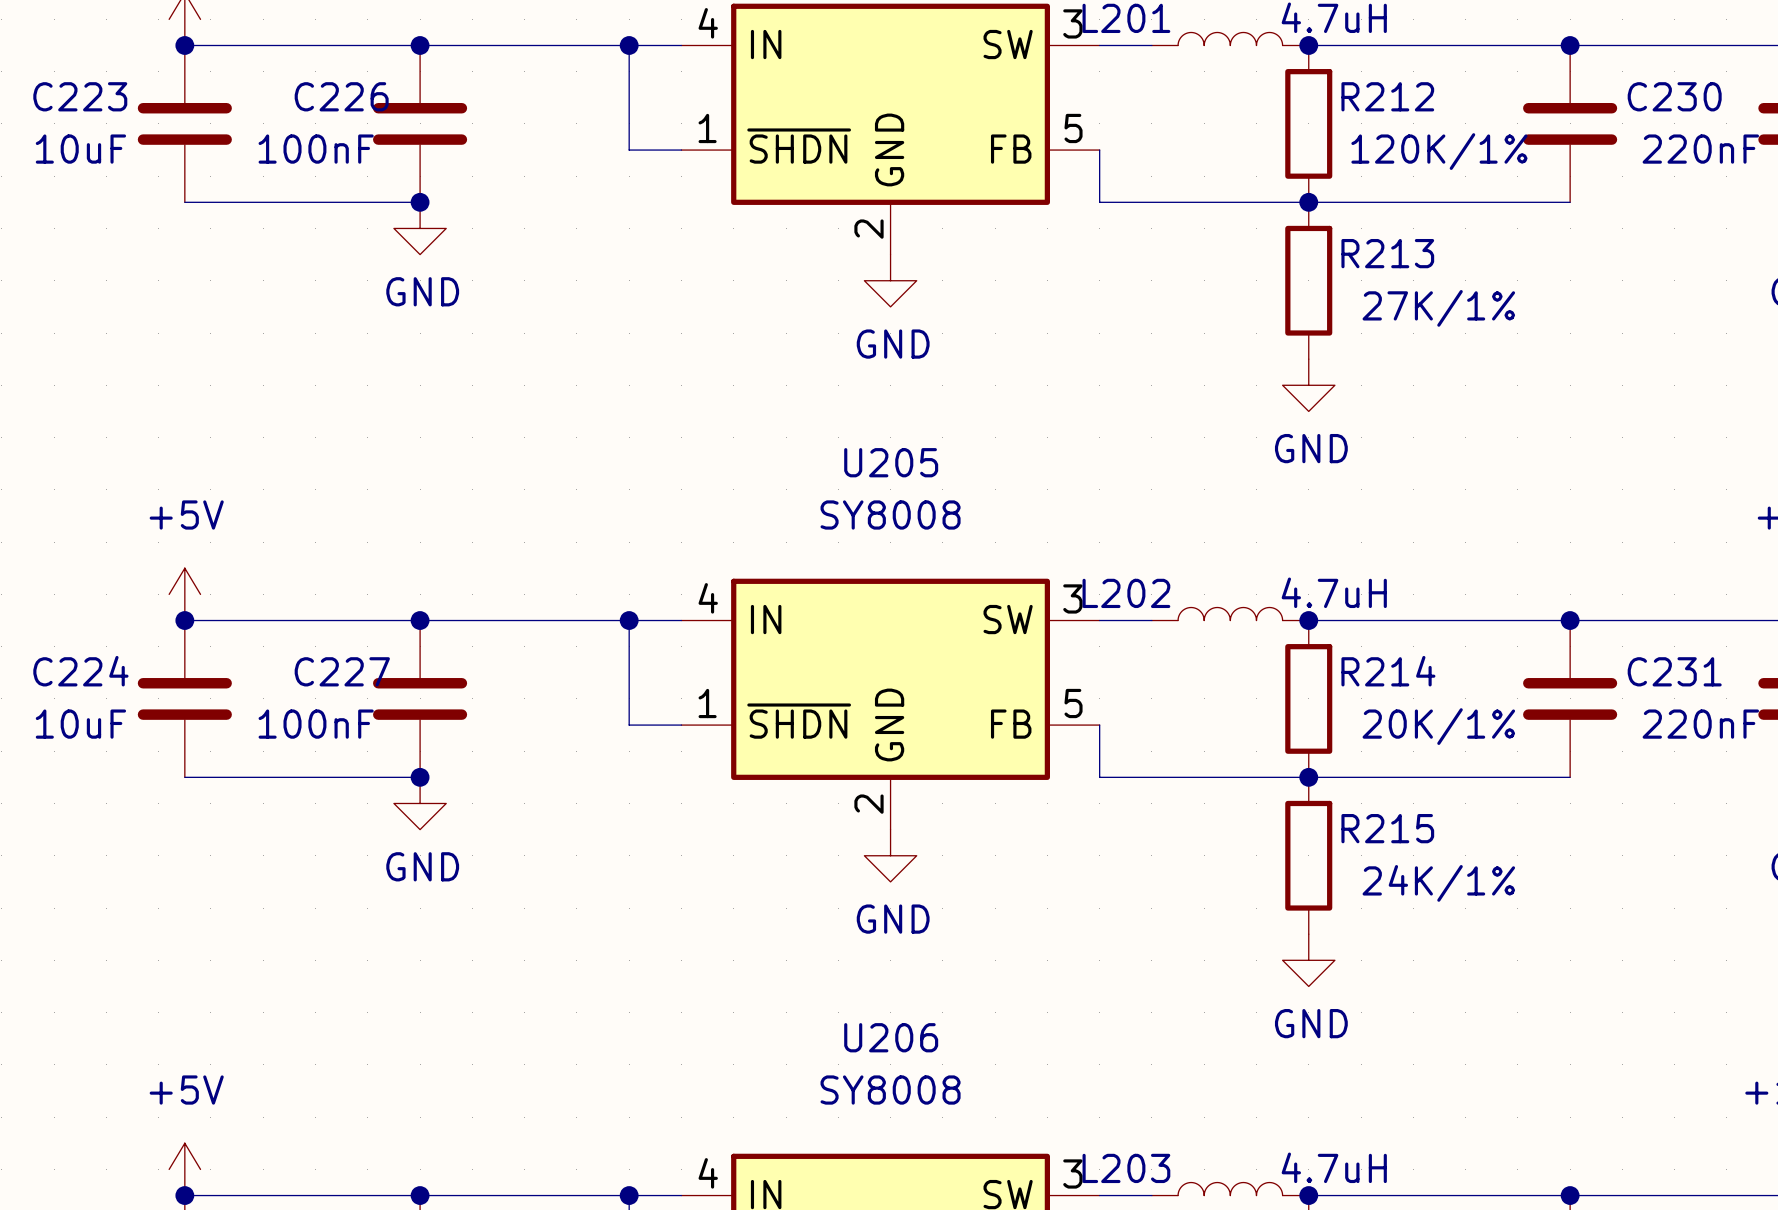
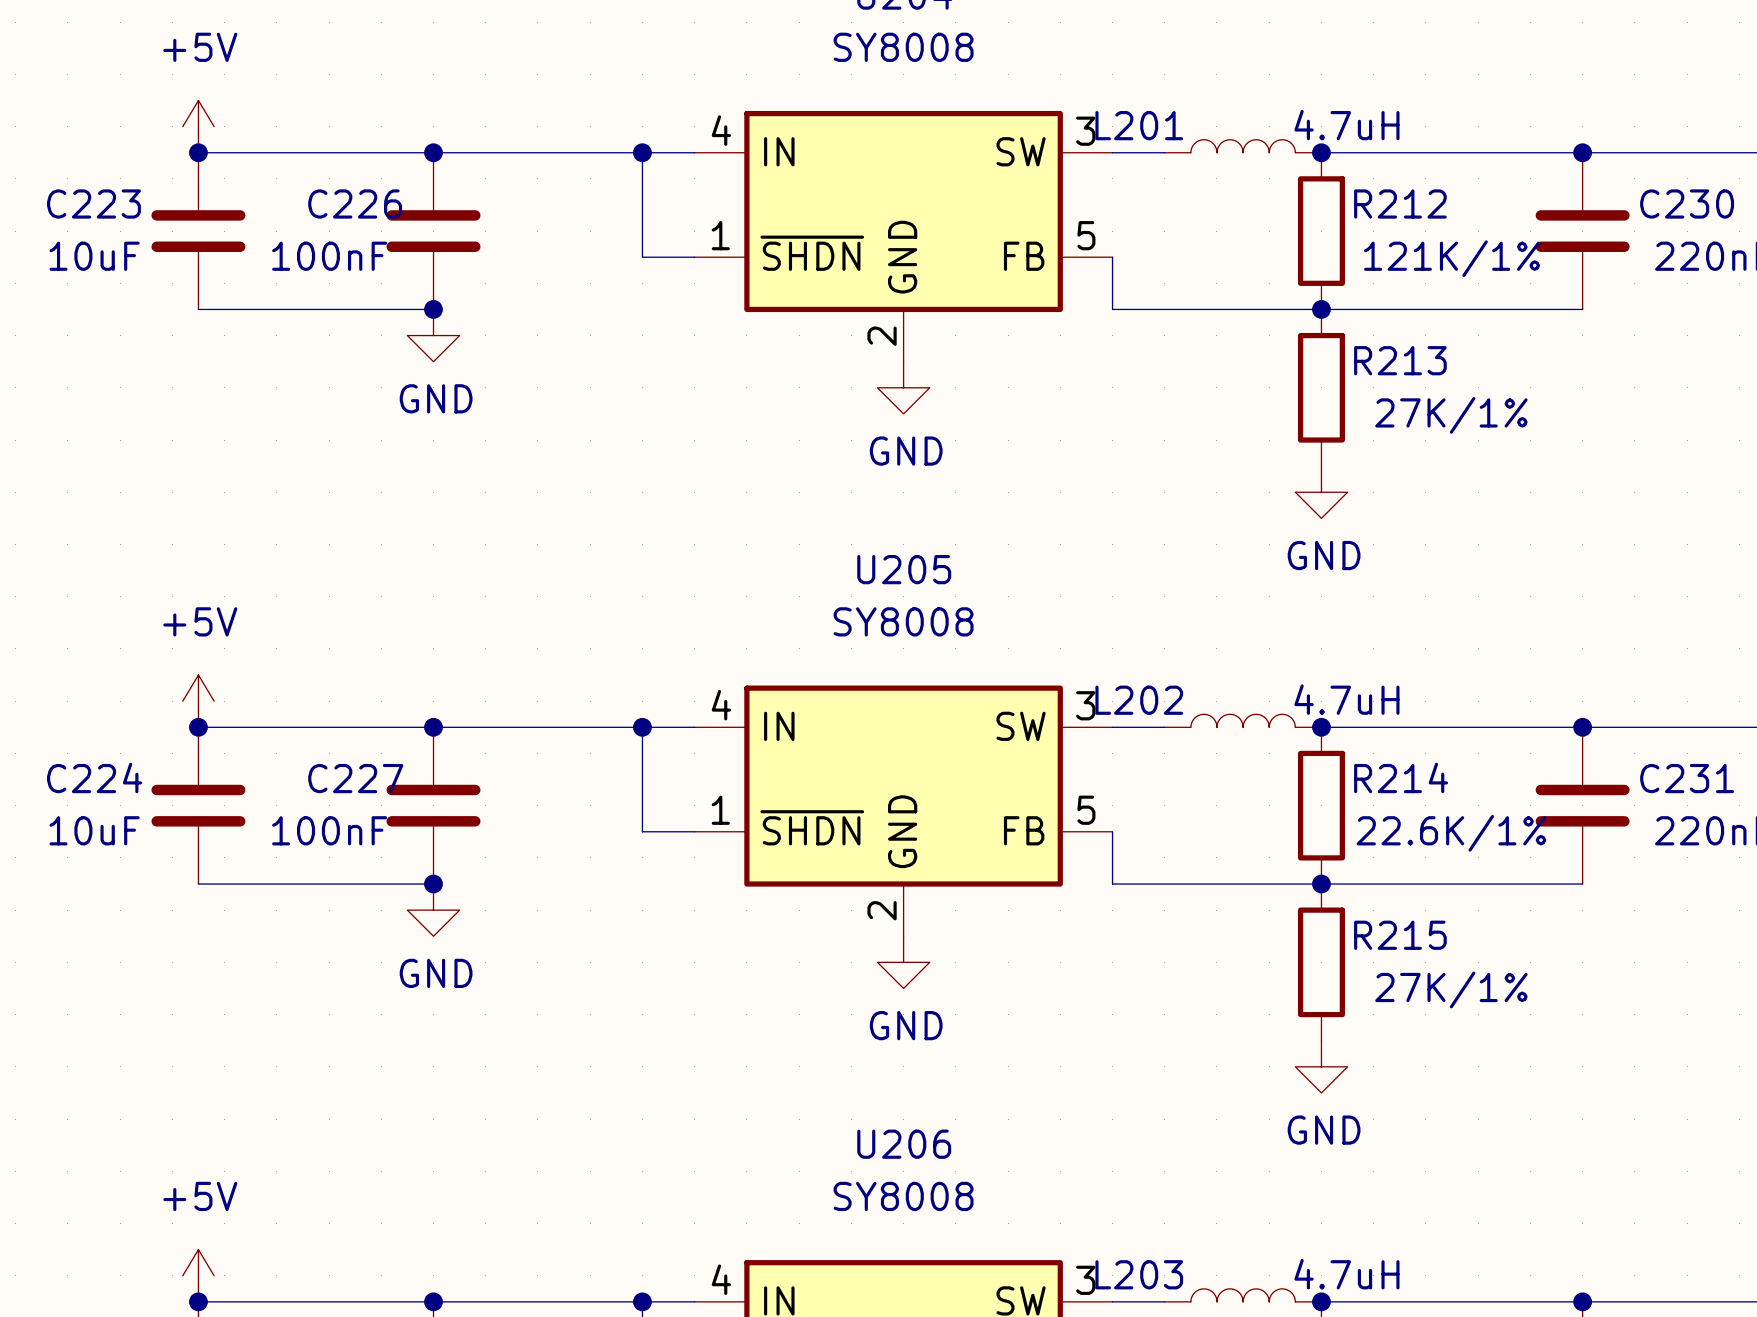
R212 value: 120K/1% (1439, 151) -> 121K/1% (1452, 258)
R214 value: 20K/1% (1438, 726) -> 22.6K/1% (1451, 833)
R215 value: 24K/1% (1438, 883) -> 27K/1% (1451, 989)

